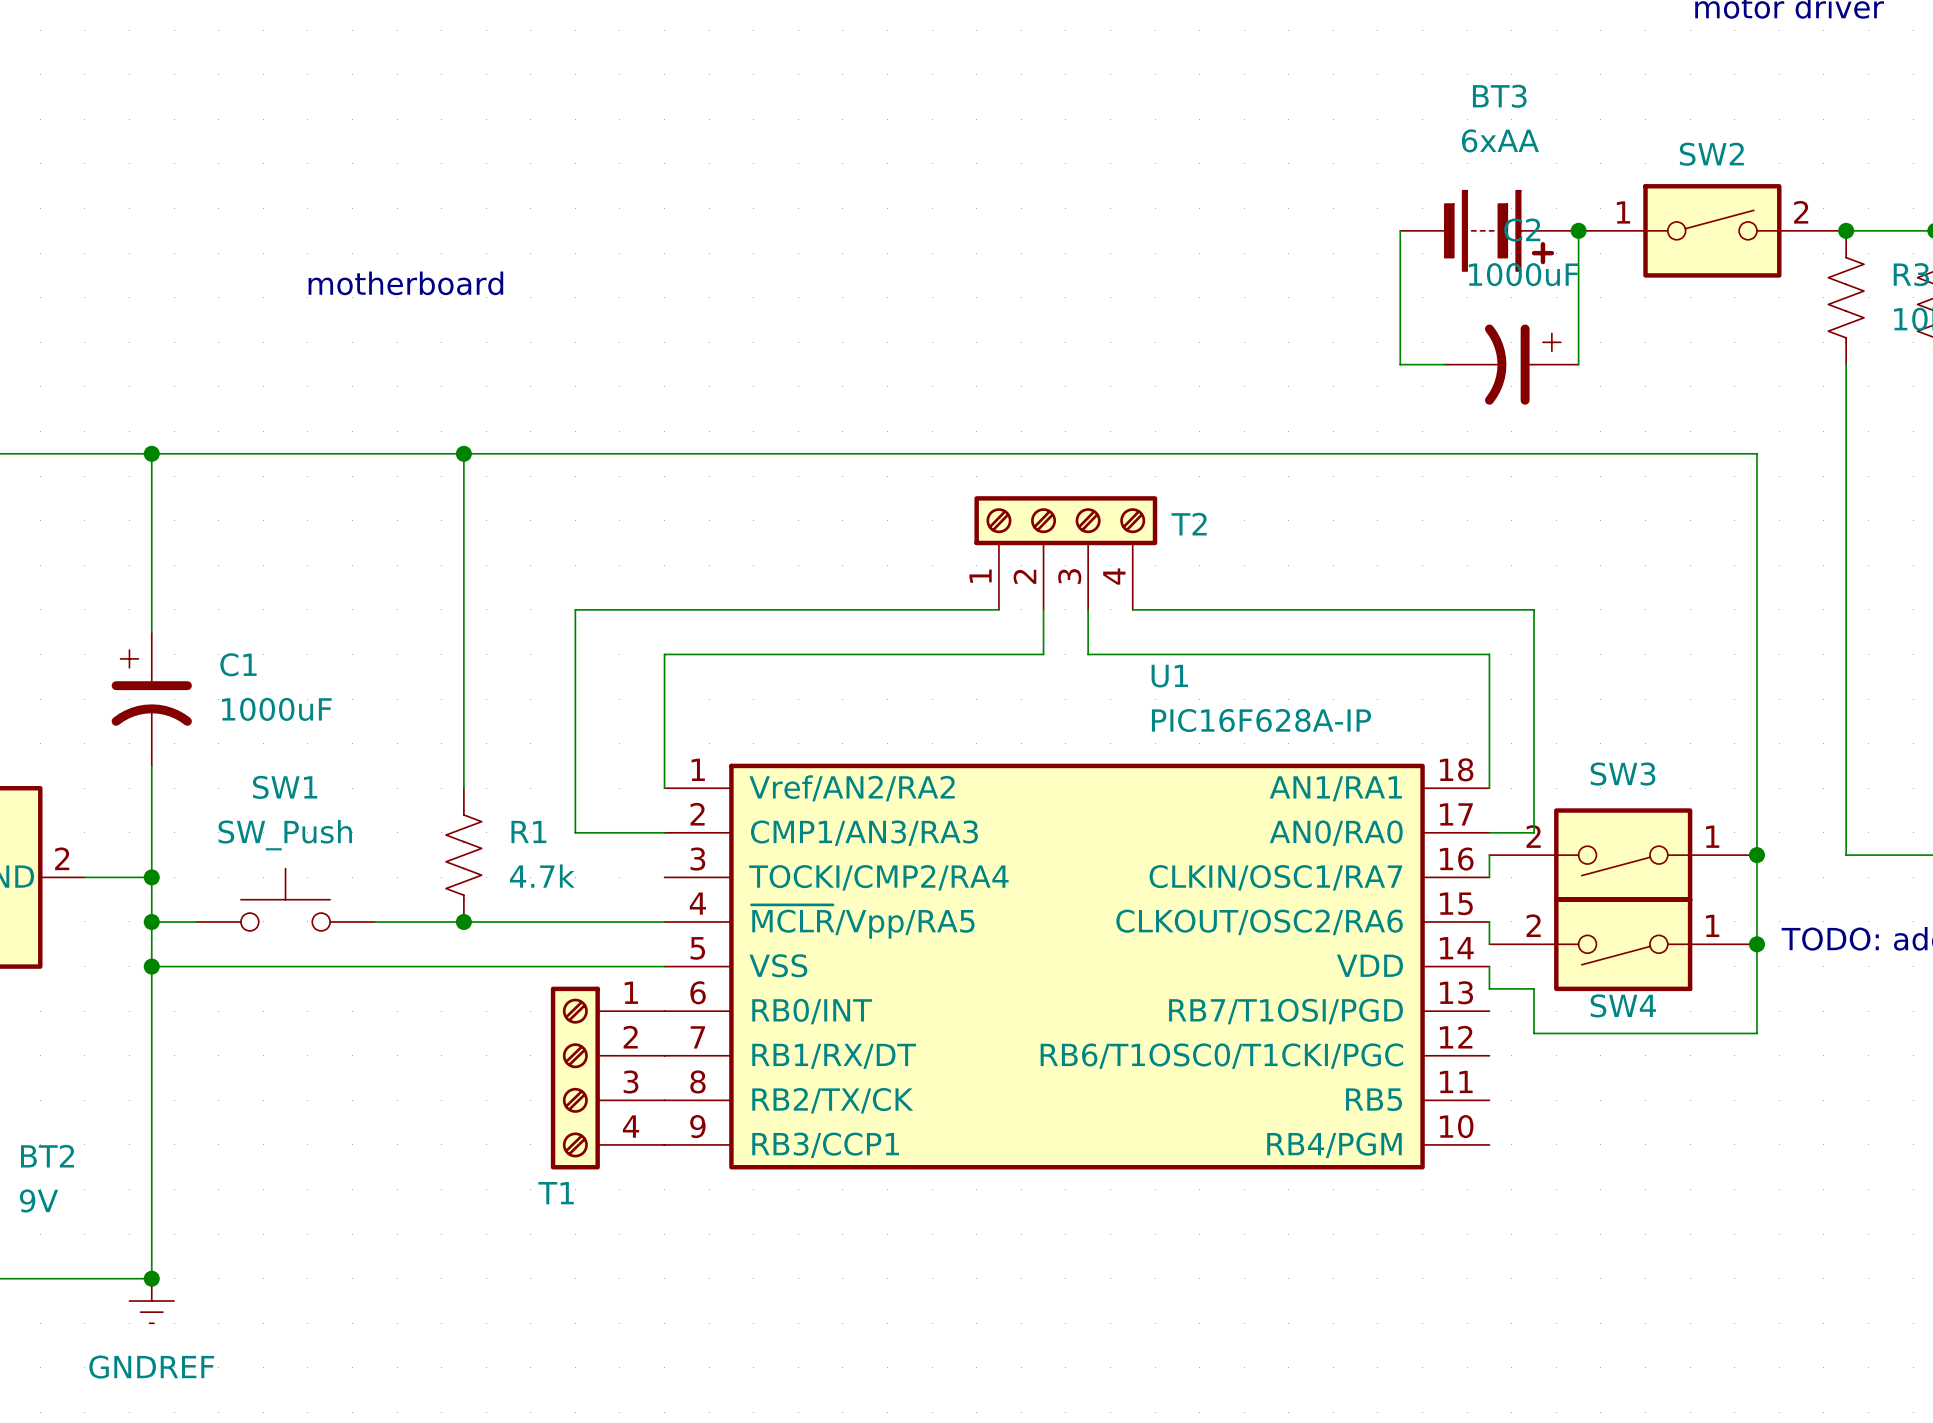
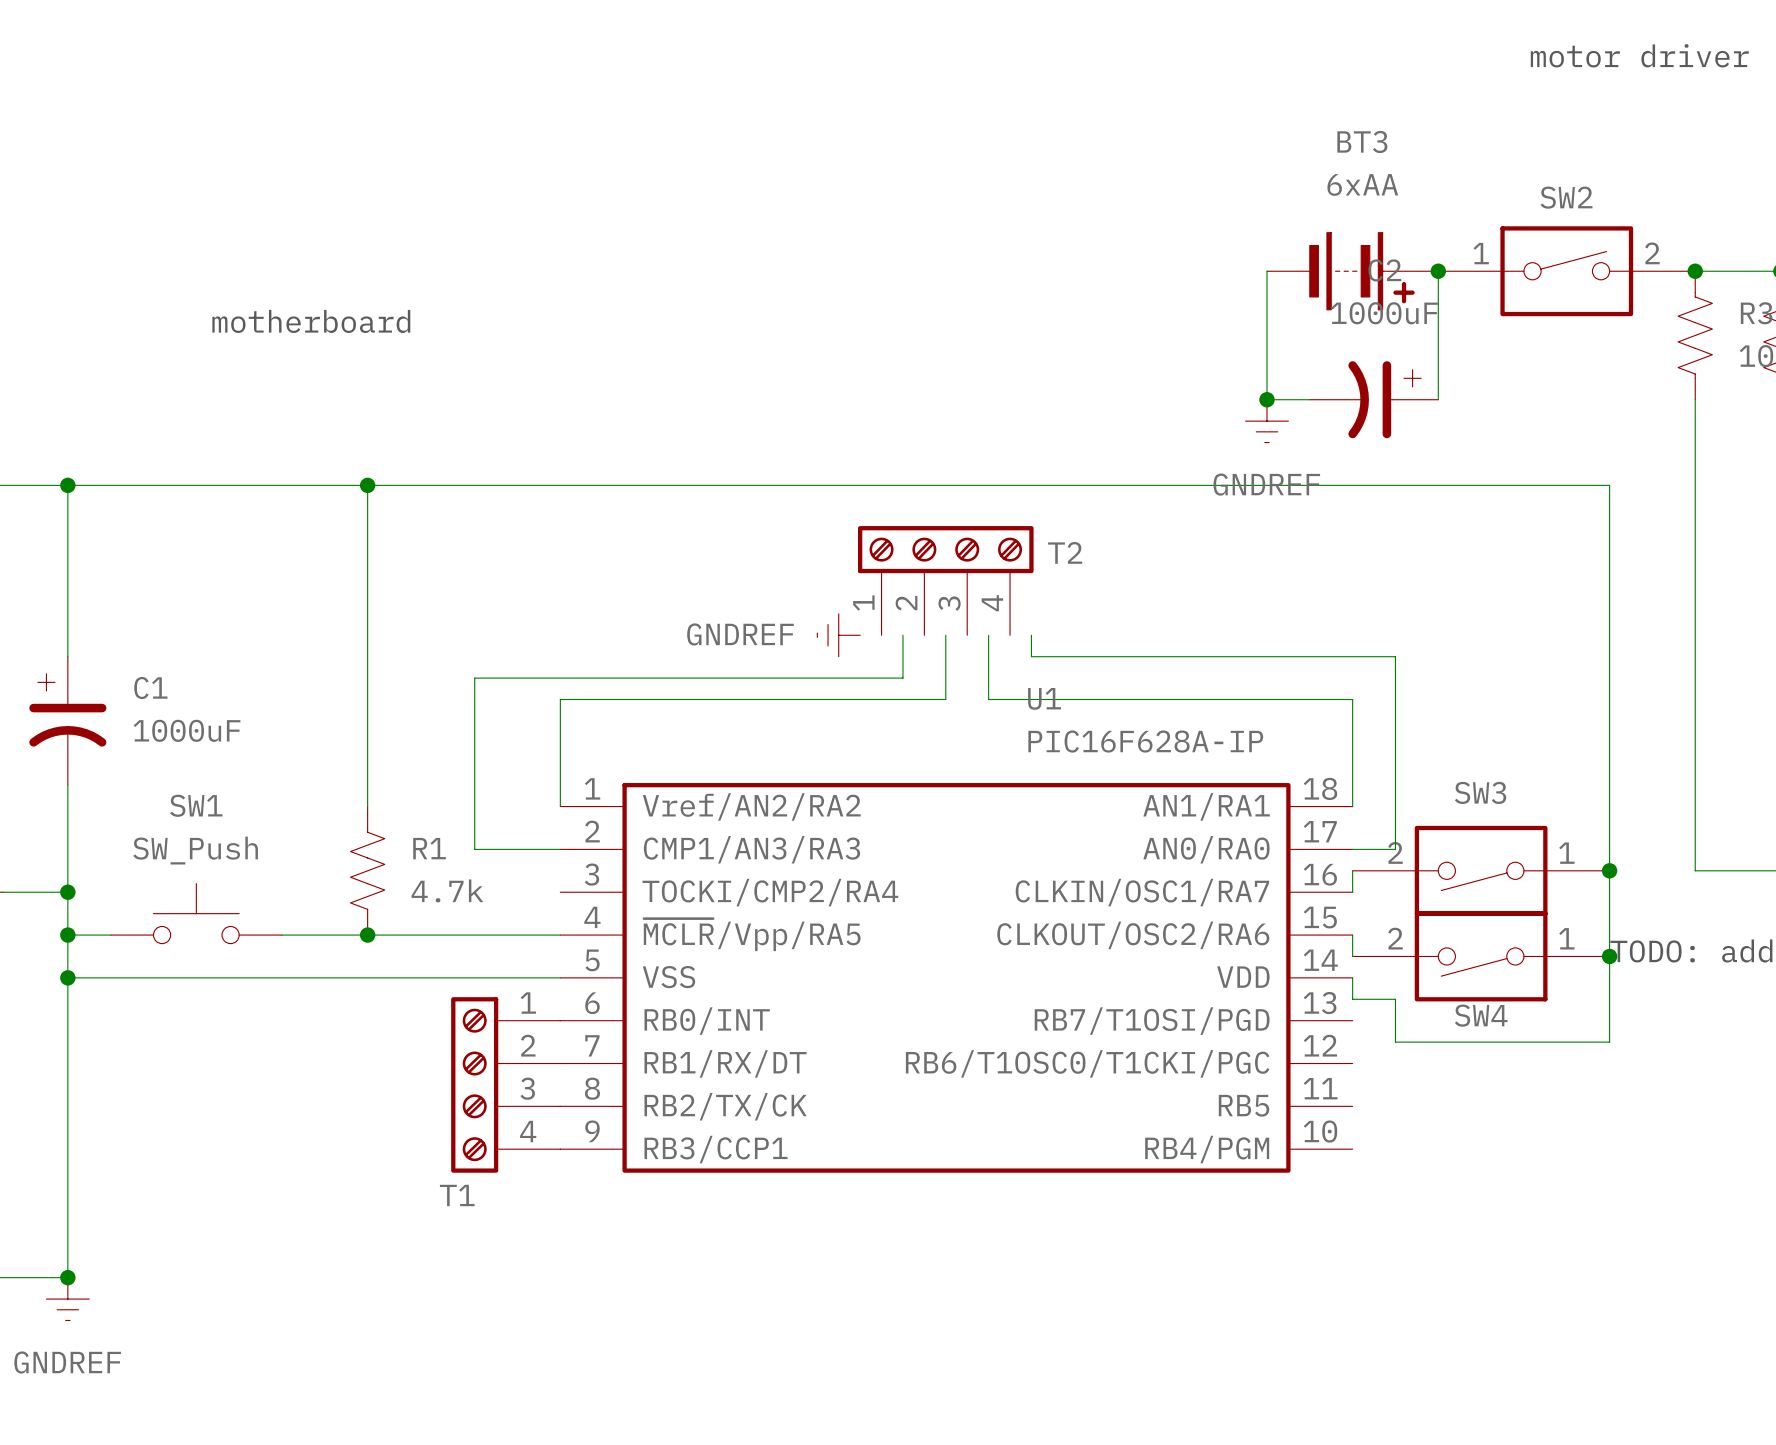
junction: none -> (1266, 399)
power symbol: none -> GNDREF (1266, 421)
power symbol: none -> GNDREF (838, 635)
wire: (998, 609) (575, 609) (575, 654) -> none
wire: (1043, 609) (1043, 654) (1021, 654) -> (902, 635) (902, 678)
wire: none -> (945, 635) (945, 699) (560, 699)
wire: (1088, 609) (1088, 654) (1489, 654) (1489, 676) -> (988, 635) (988, 699) (1352, 699)
wire: (1132, 609) (1534, 609) (1534, 632) -> (1031, 635) (1031, 656) (1395, 656)
wire: (664, 654) (664, 676) -> (560, 678) (474, 678)

